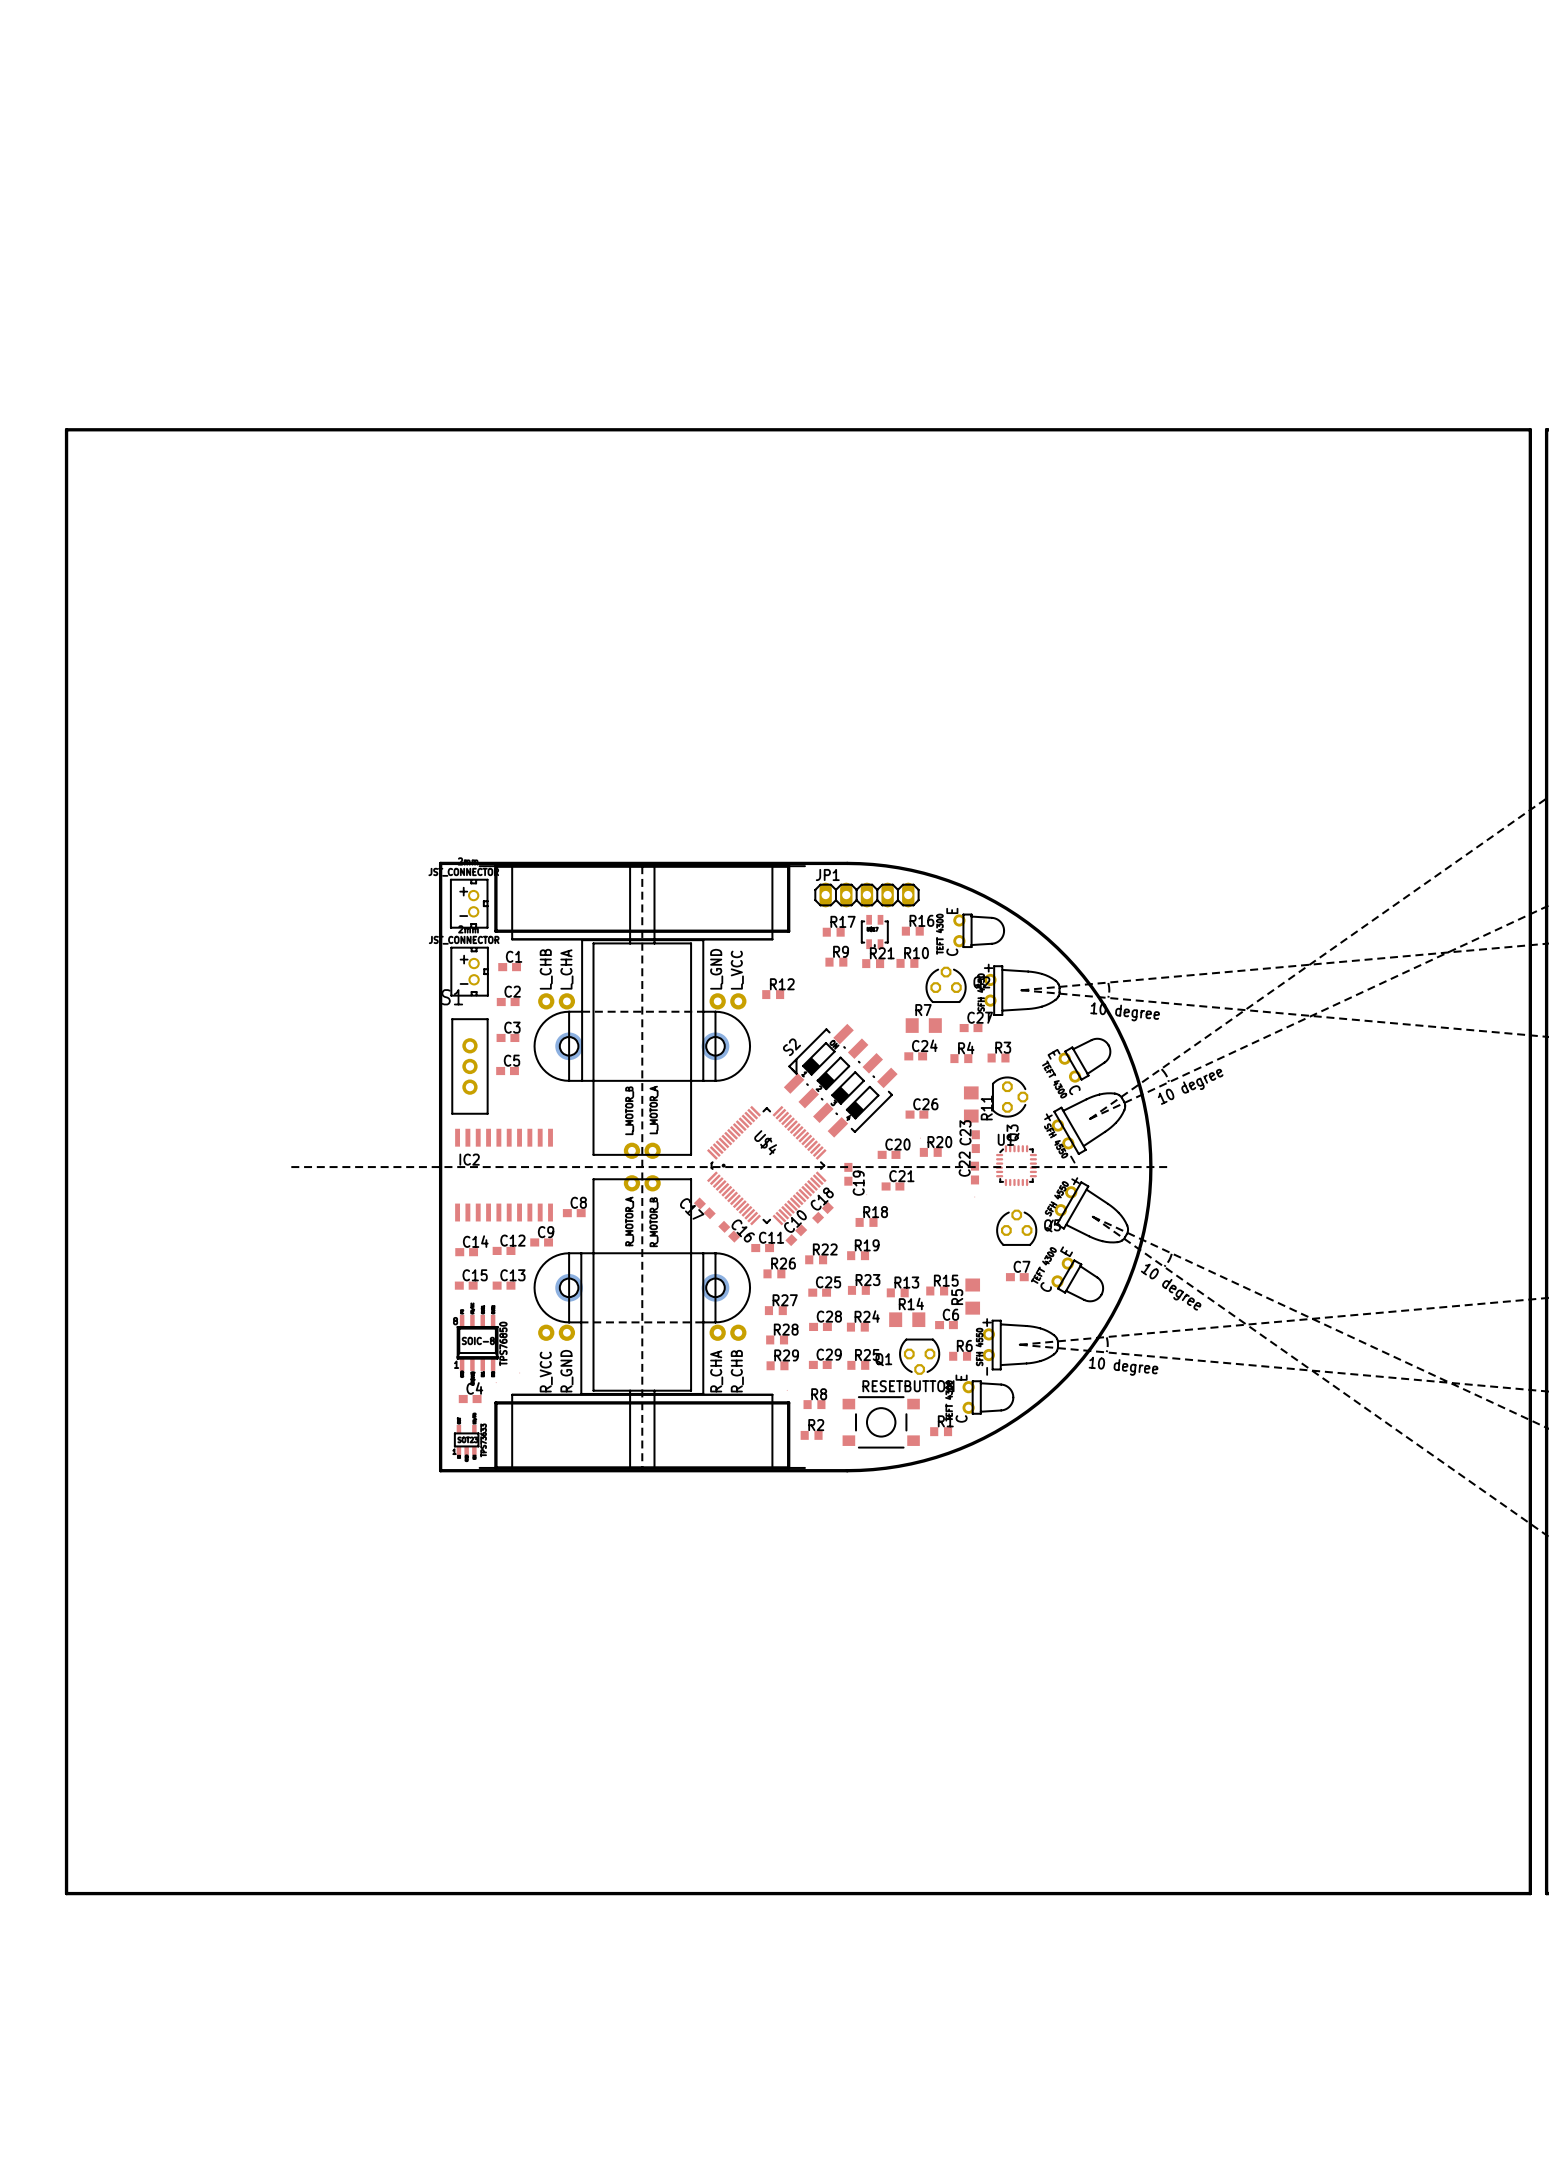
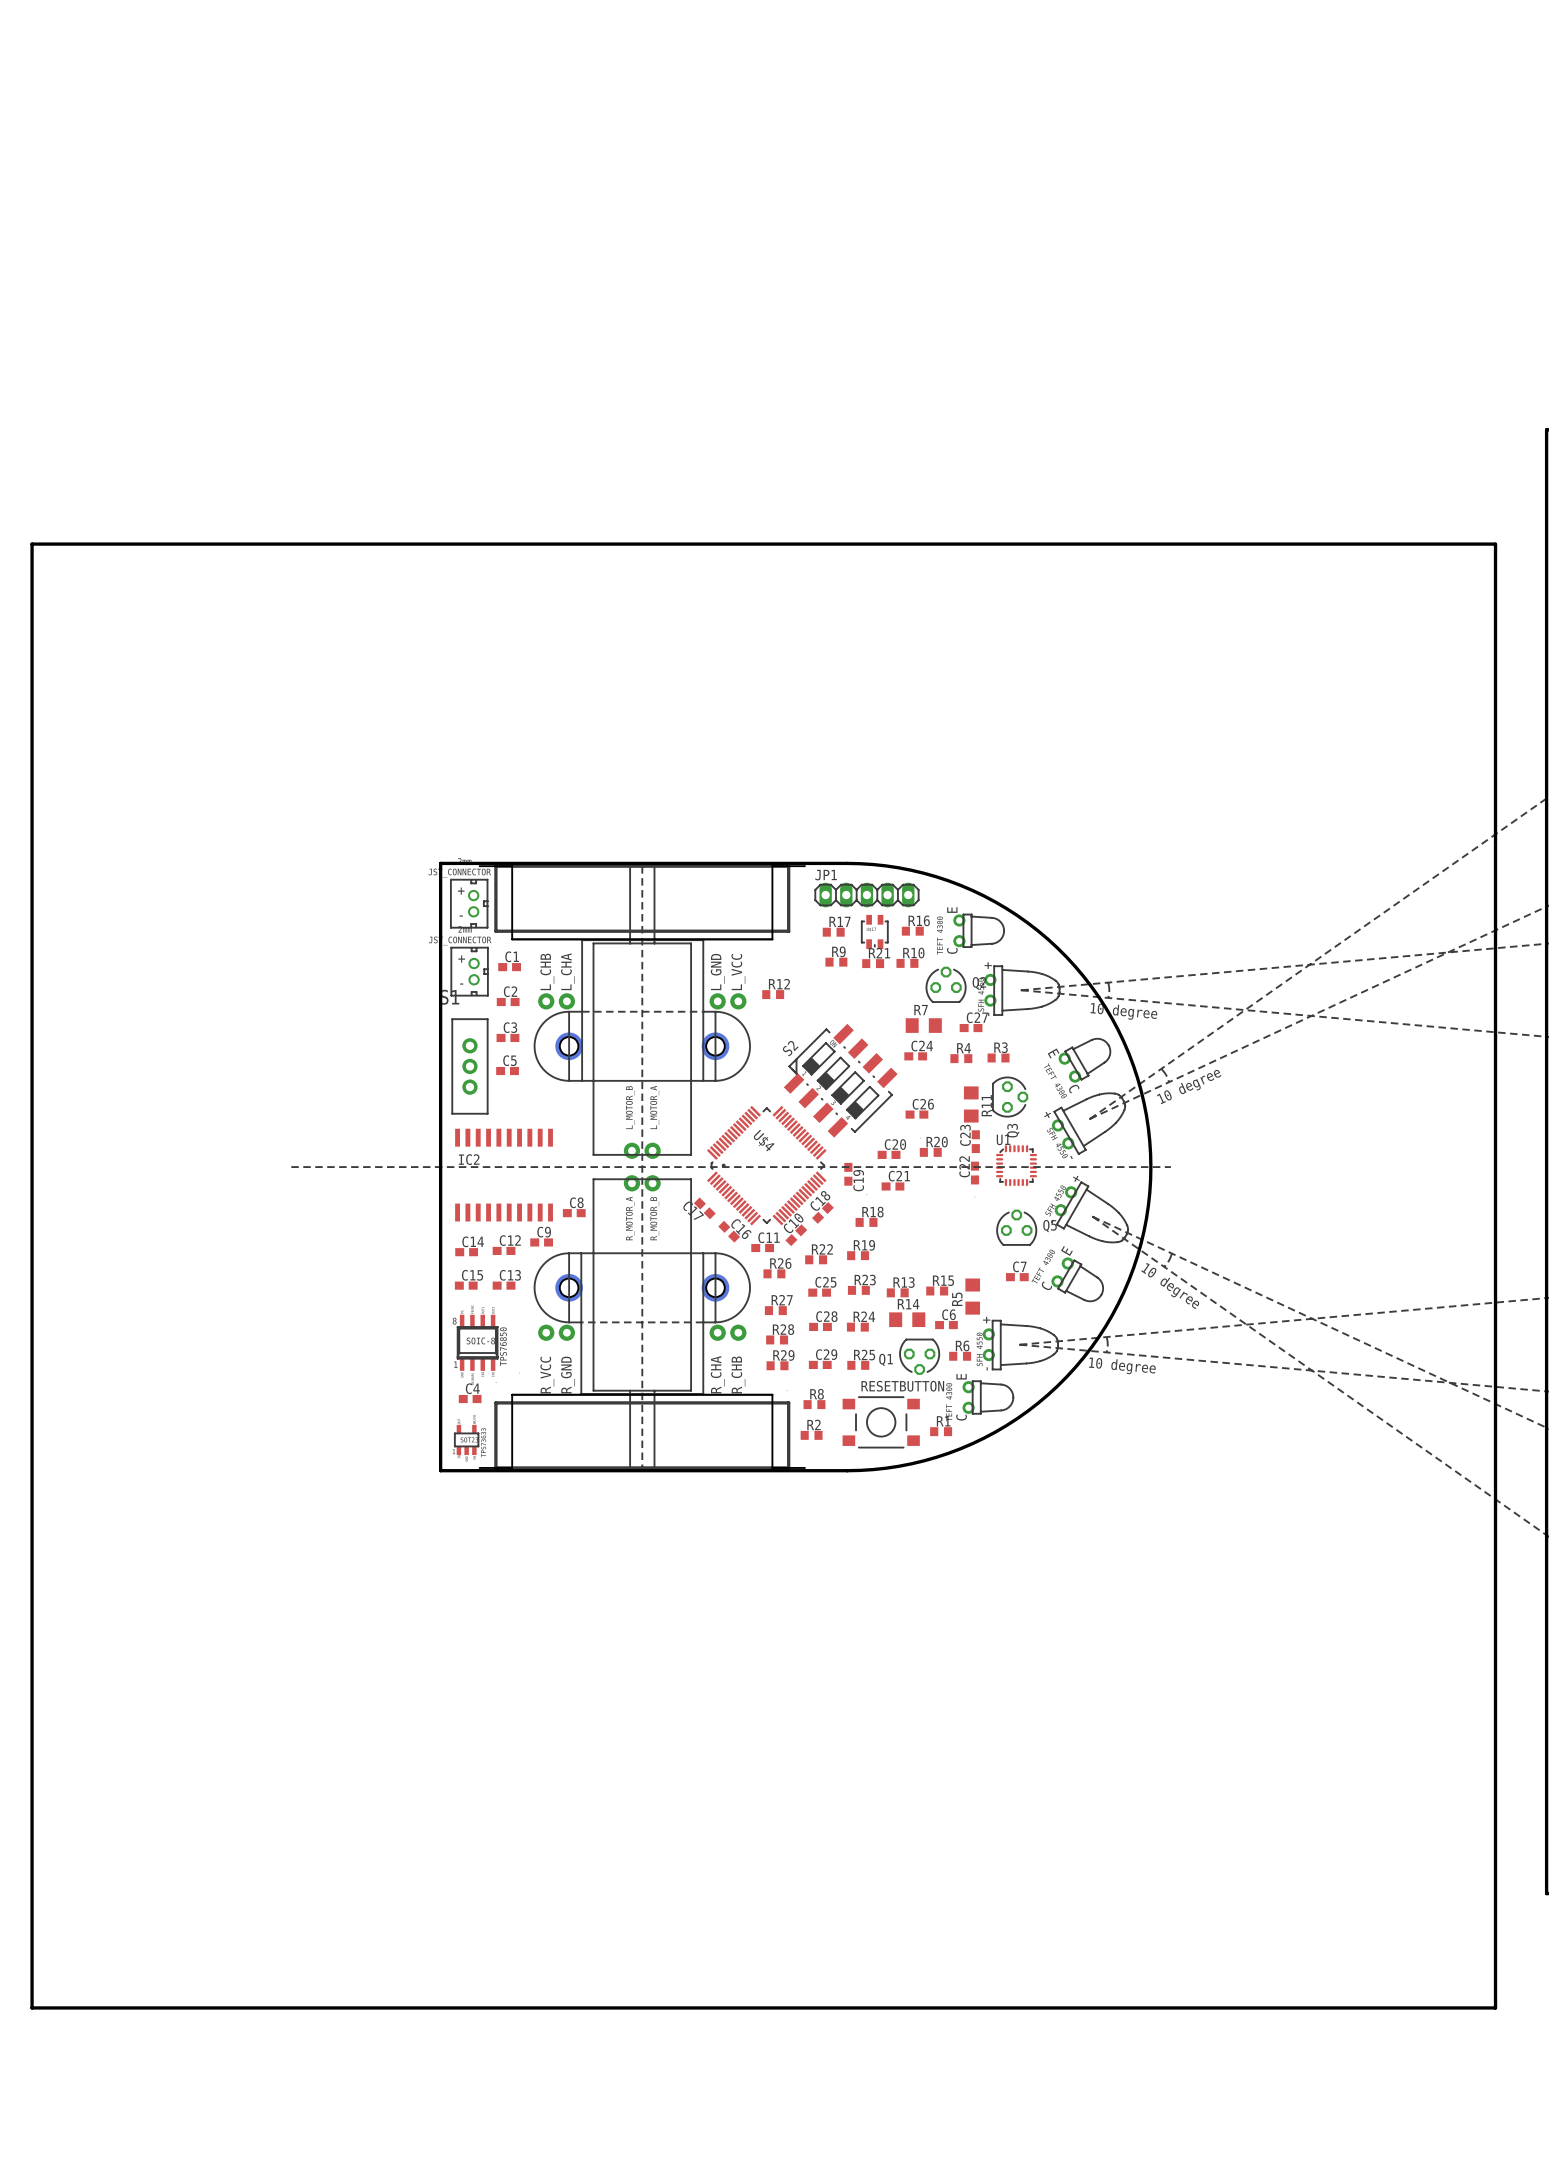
board edge: (66, 429) (66, 1893) (1530, 1893) (1530, 429) (66, 429) -> none
board edge: none -> (32, 544) (1495, 544)
board edge: none -> (32, 544) (32, 2007) (1495, 2007) (1495, 544)

